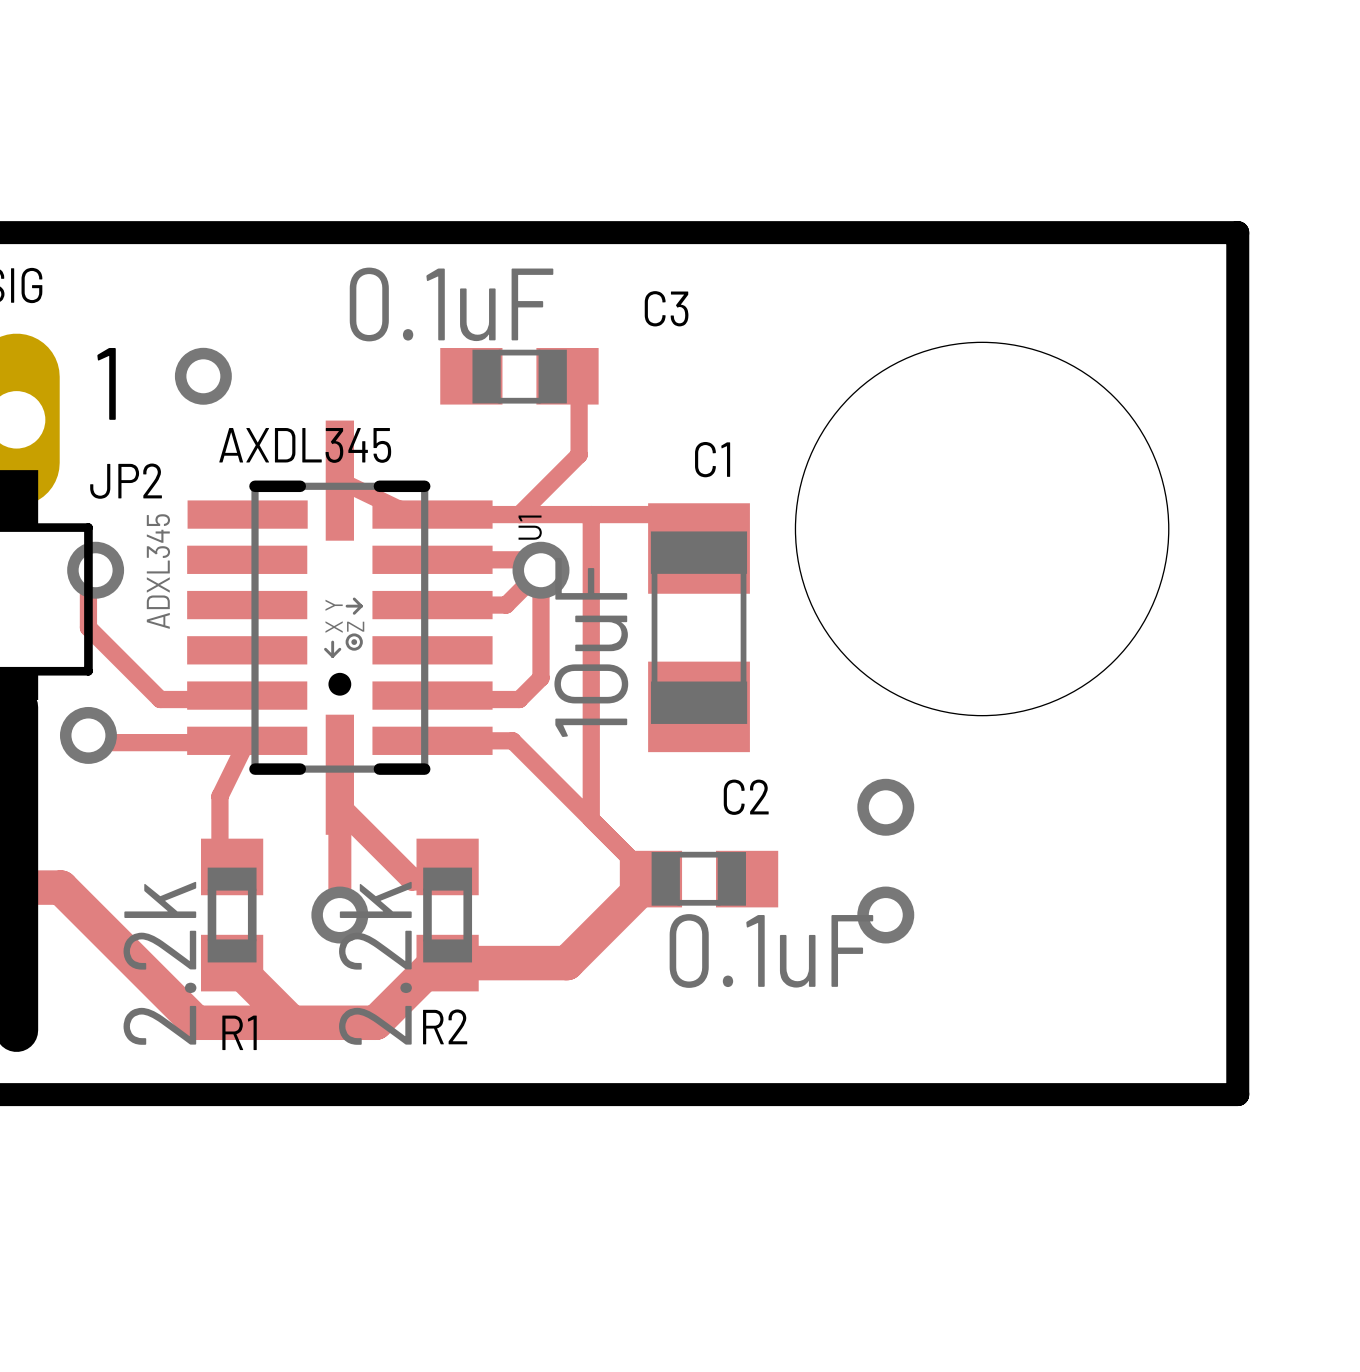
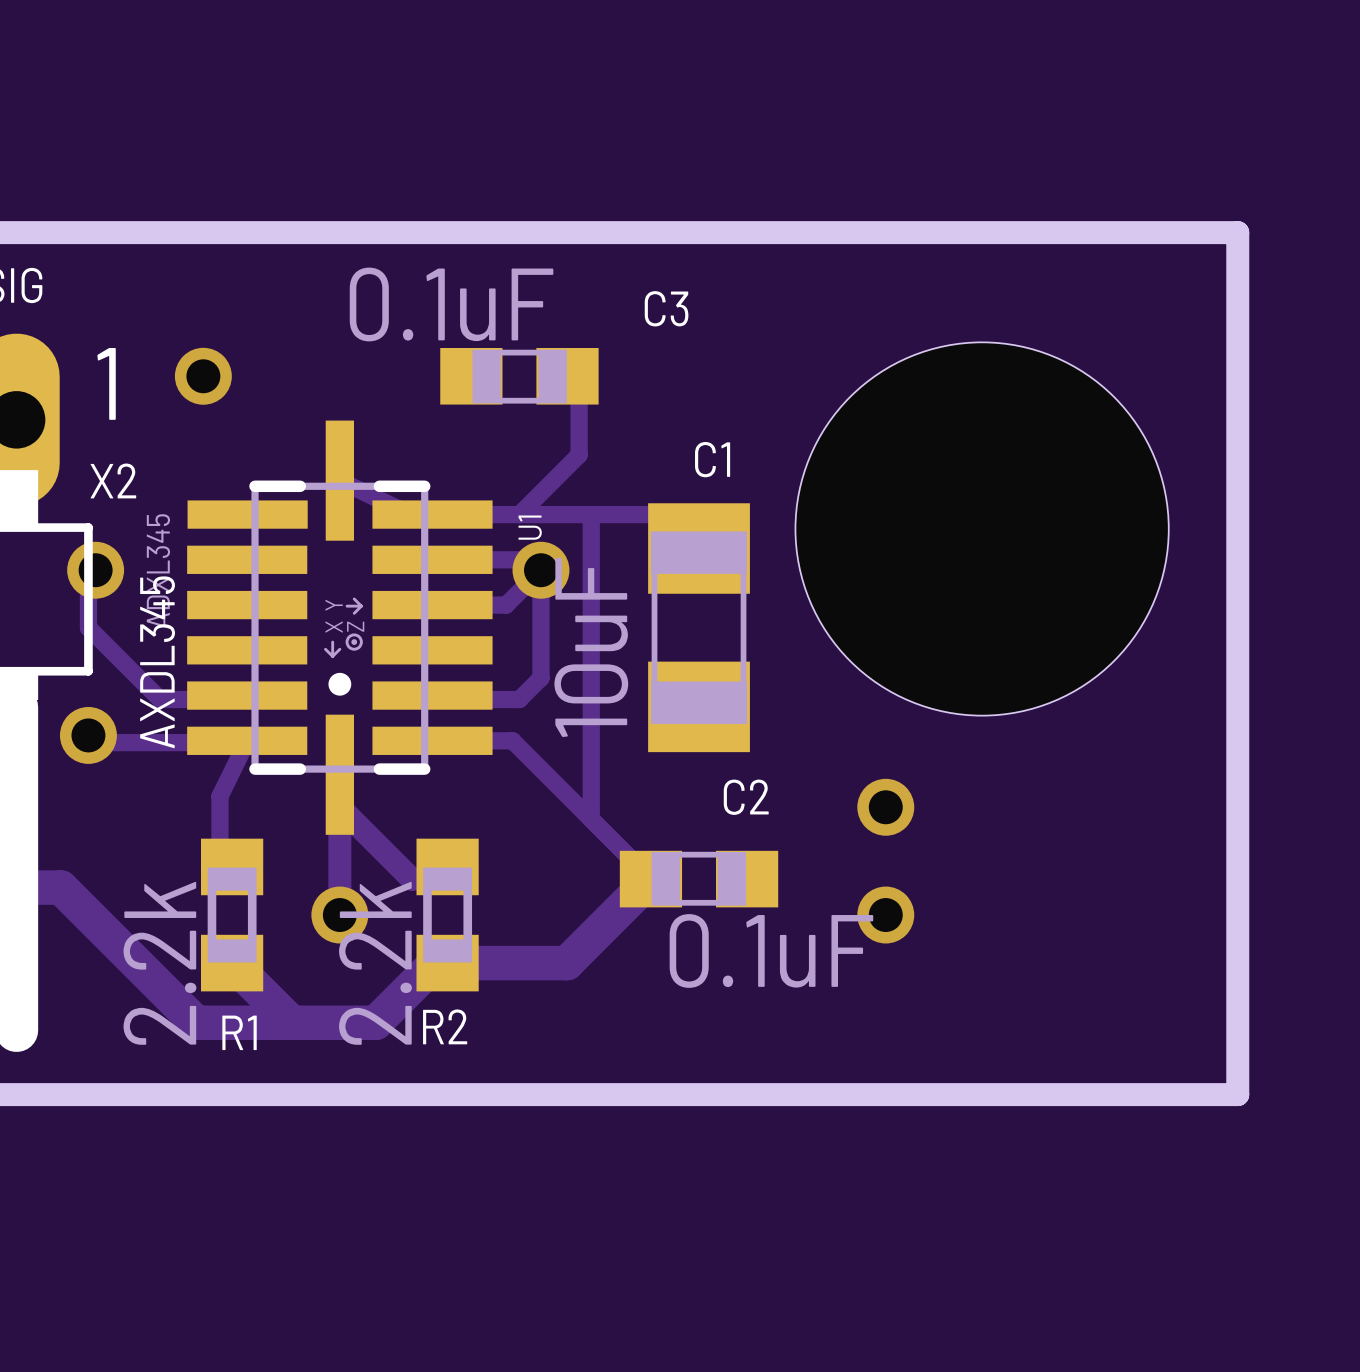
text rotation: 0° (305, 445) -> 90° counterclockwise (157, 662)
text position: AXDL345 (305, 445) -> AXDL345 (157, 662)
JP2 name: JP2 (126, 481) -> X2 (113, 480)

